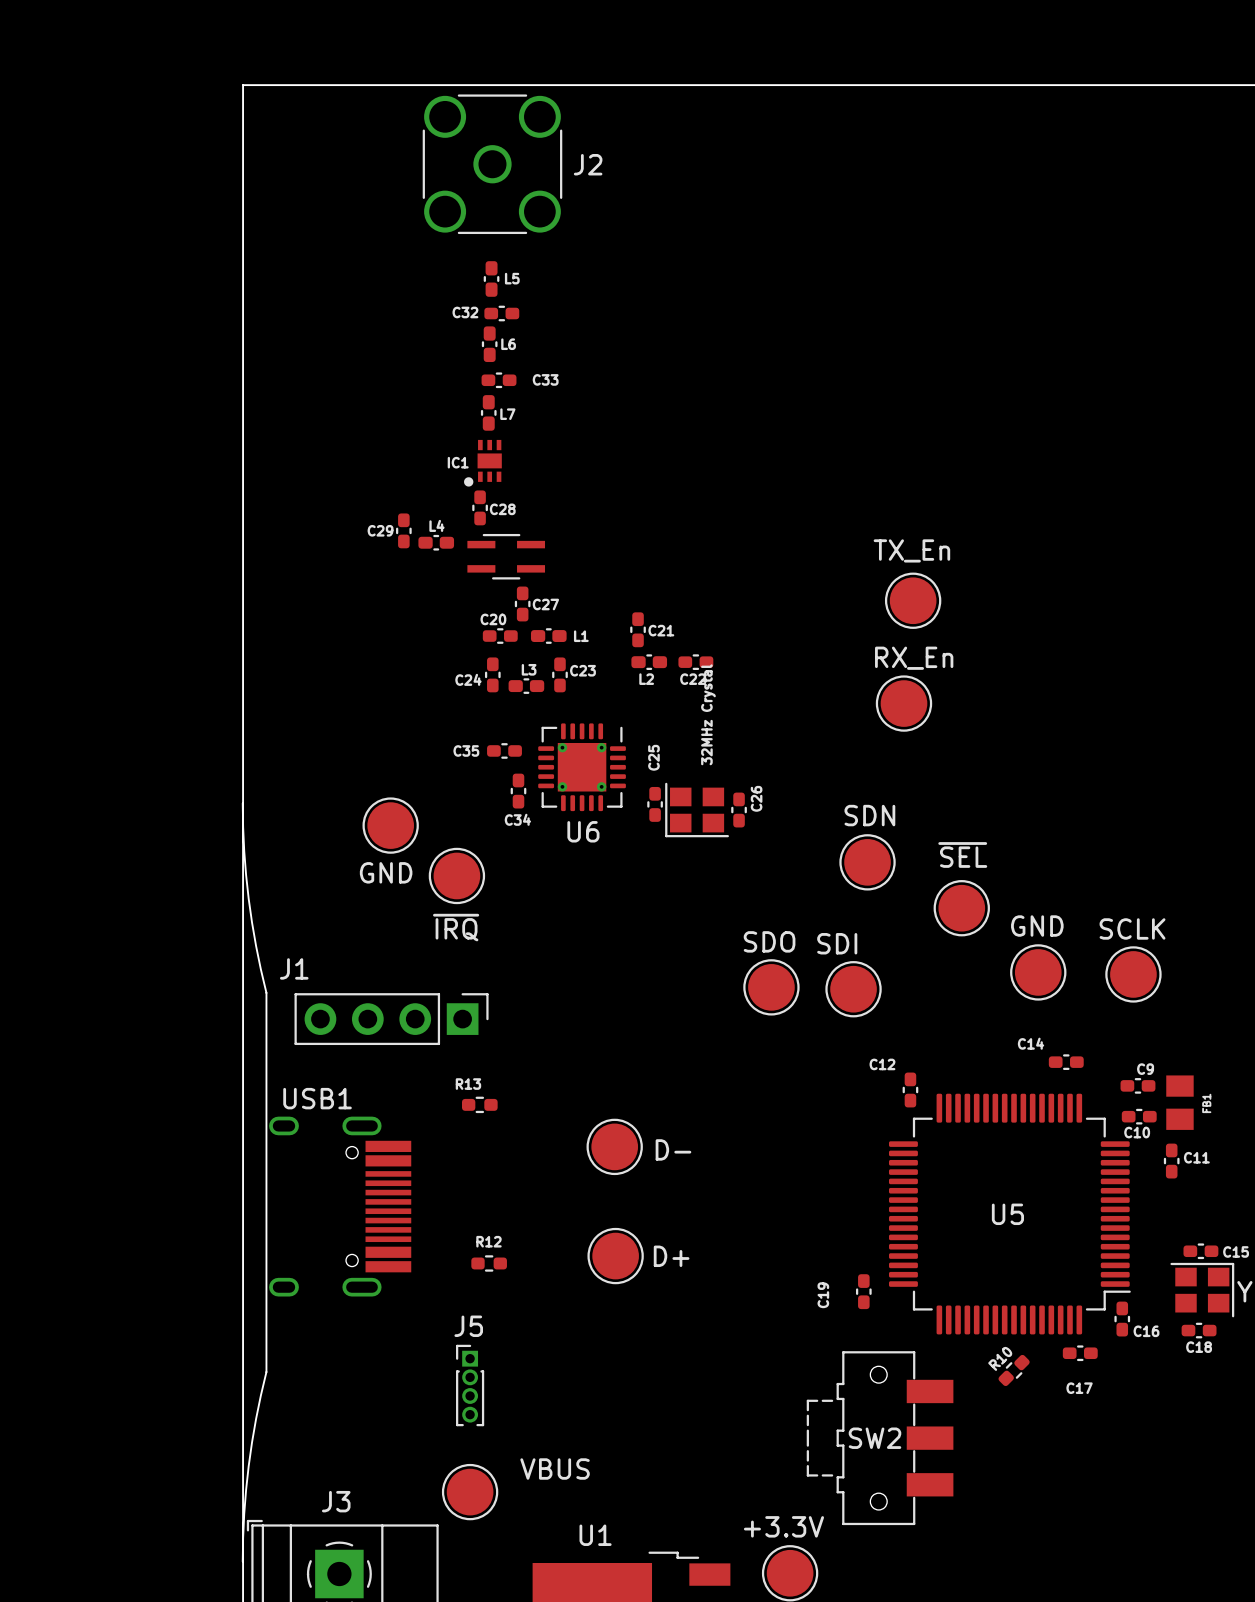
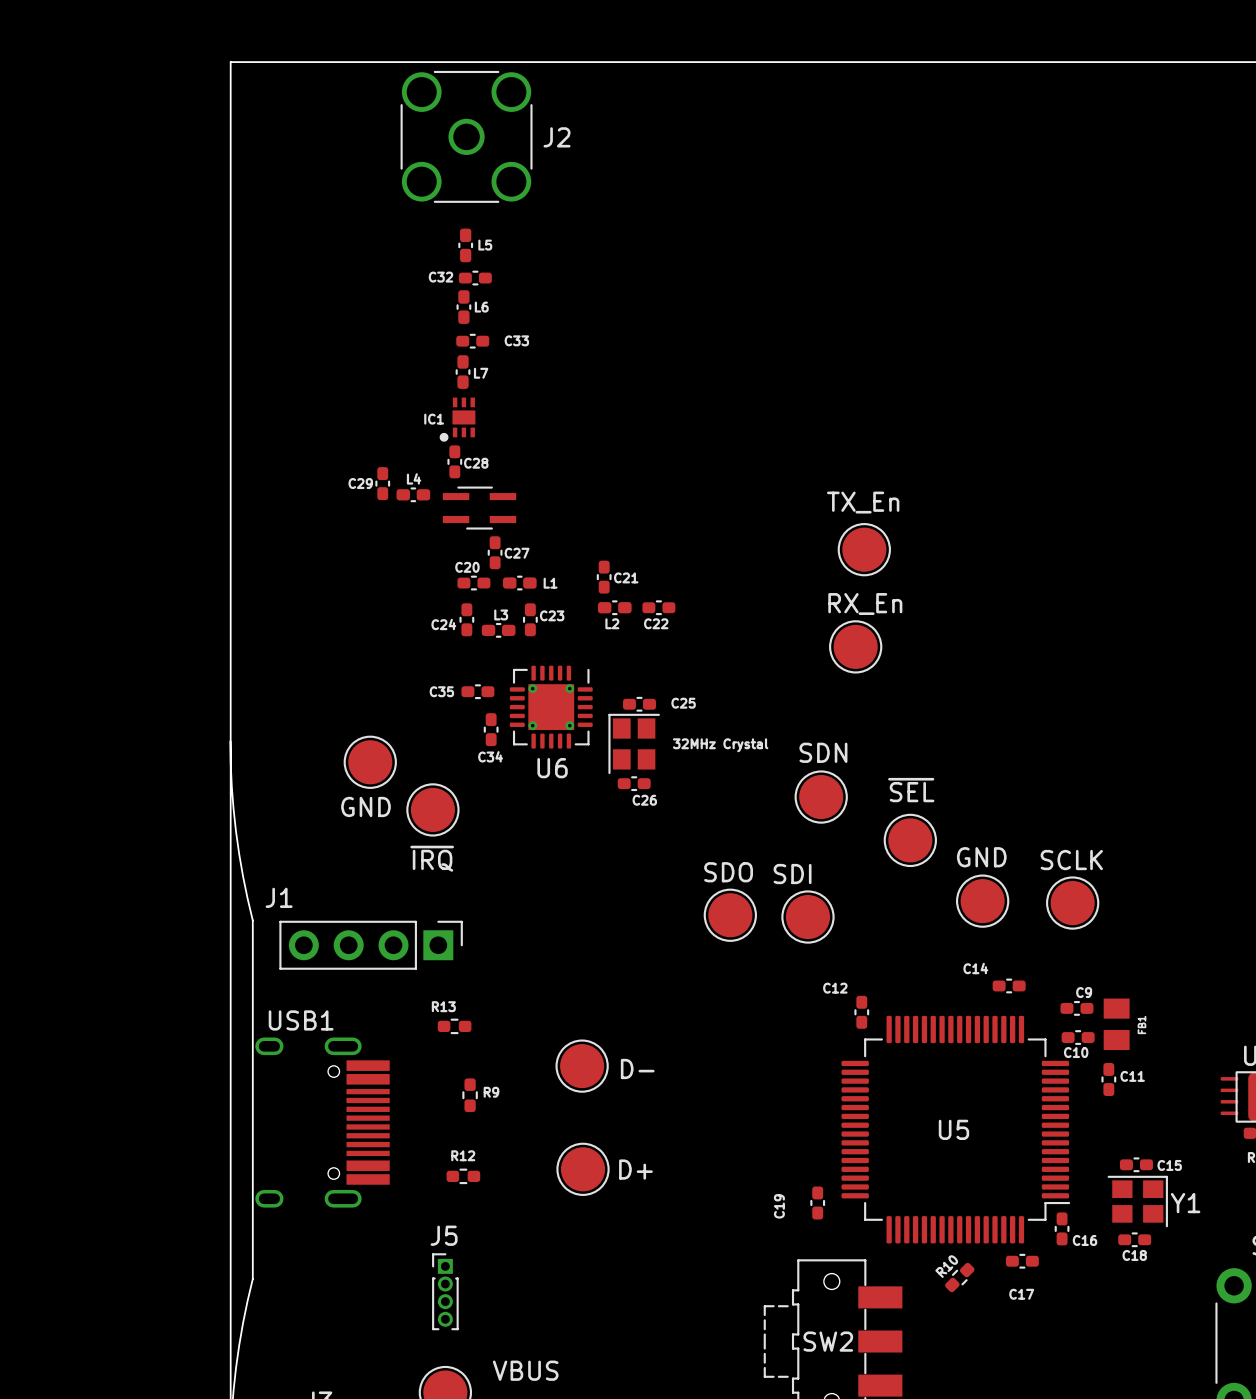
text rotation: 0° (708, 714) -> 90° clockwise (720, 745)
C25 rotation: 0° (655, 804) -> 90° clockwise (639, 704)
C25 position: (655, 804) -> (639, 704)
part rotation: 0° (697, 810) -> 90° clockwise (634, 743)
C26 rotation: 0° (739, 810) -> 90° clockwise (634, 783)
C26 position: (739, 810) -> (634, 783)
R9: none -> (470, 1095)

